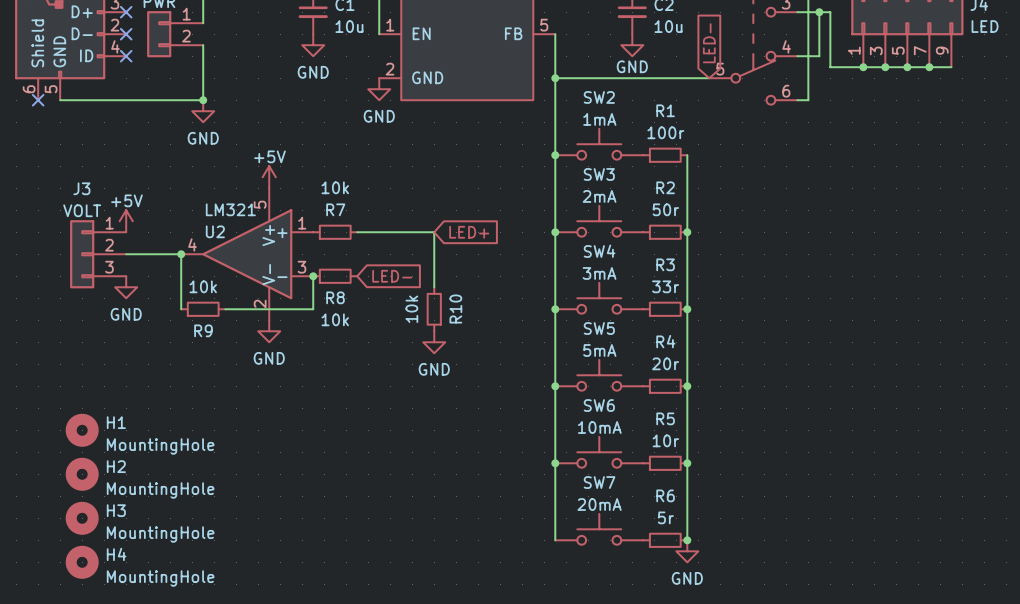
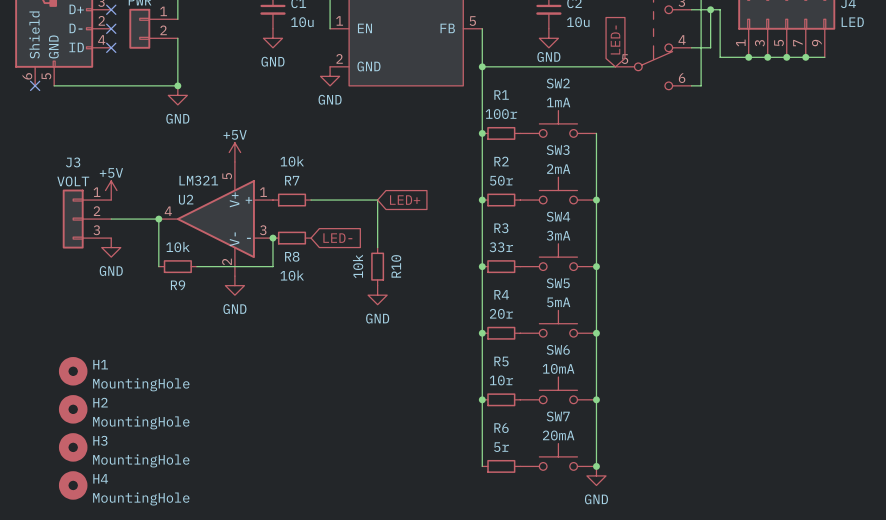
SW2 position: (599, 144) -> (558, 123)
R1 position: (665, 155) -> (501, 133)
SW3 position: (599, 221) -> (558, 190)
R2 position: (665, 232) -> (501, 200)
SW4 position: (599, 298) -> (558, 257)
R3 position: (665, 309) -> (501, 266)
SW5 position: (599, 375) -> (558, 323)
R4 position: (665, 386) -> (501, 333)
SW6 position: (599, 452) -> (558, 390)
R5 position: (665, 463) -> (501, 399)
SW7 position: (599, 529) -> (558, 456)
R6 position: (665, 540) -> (501, 466)

